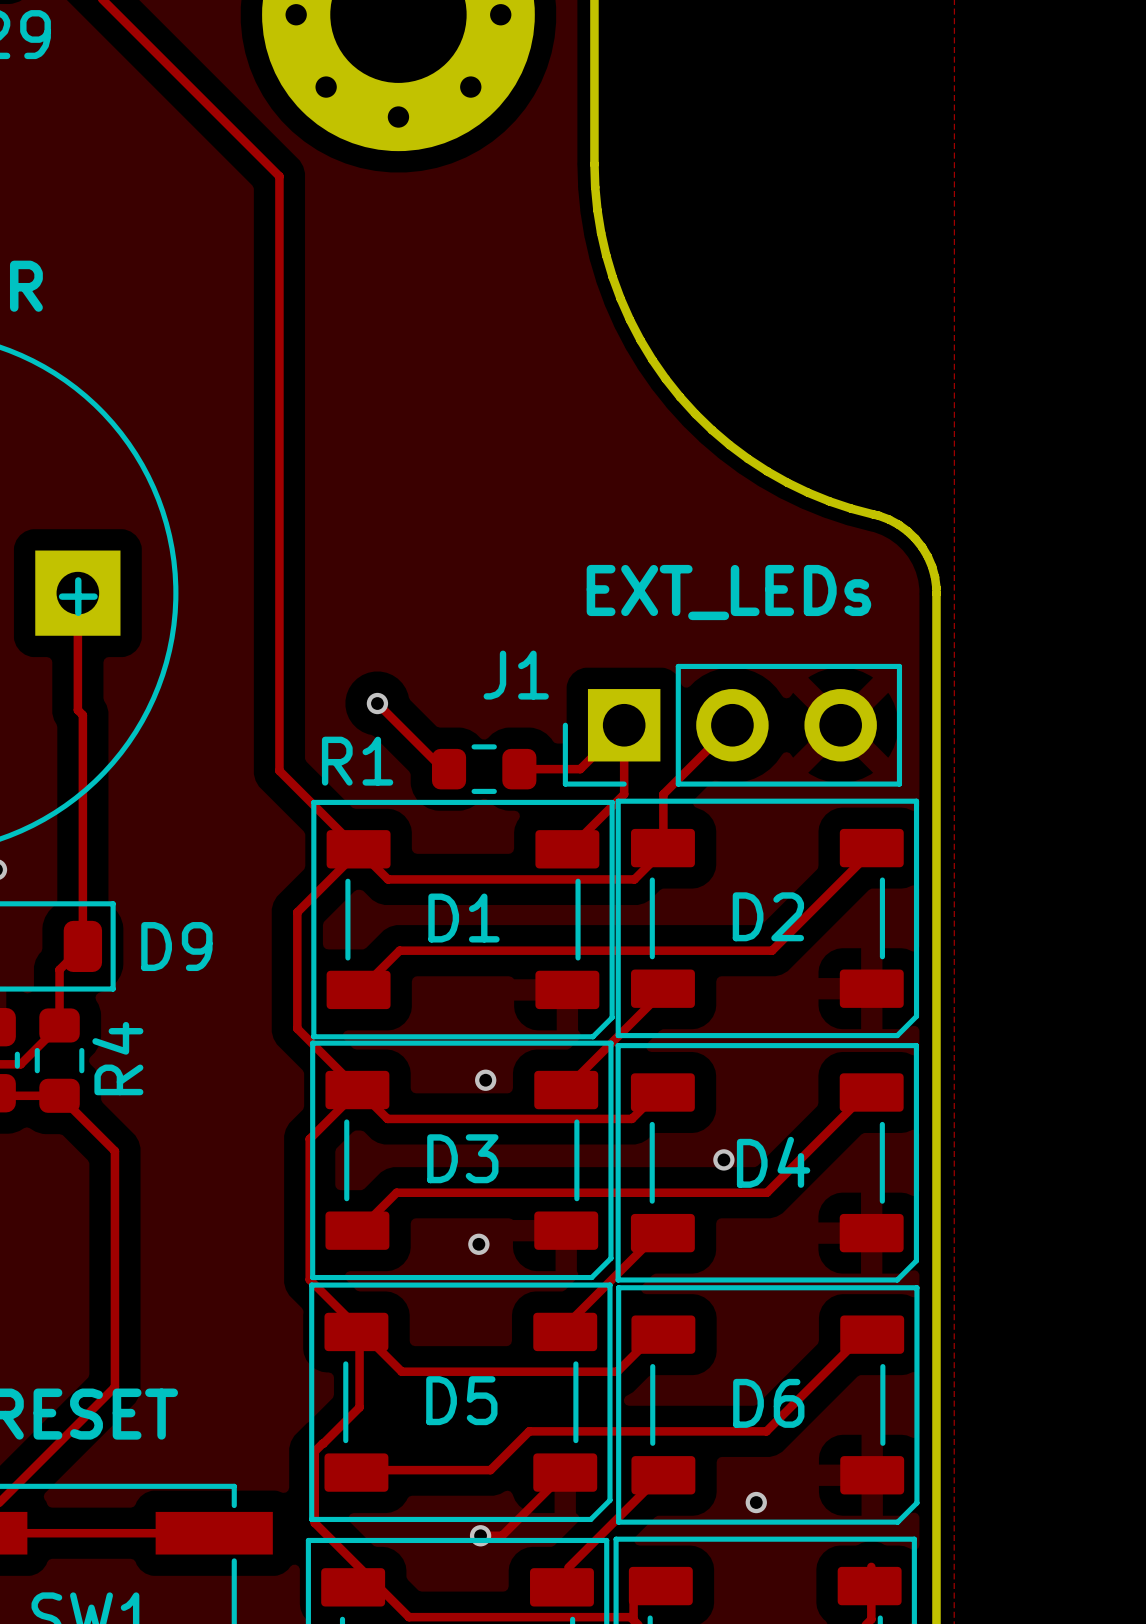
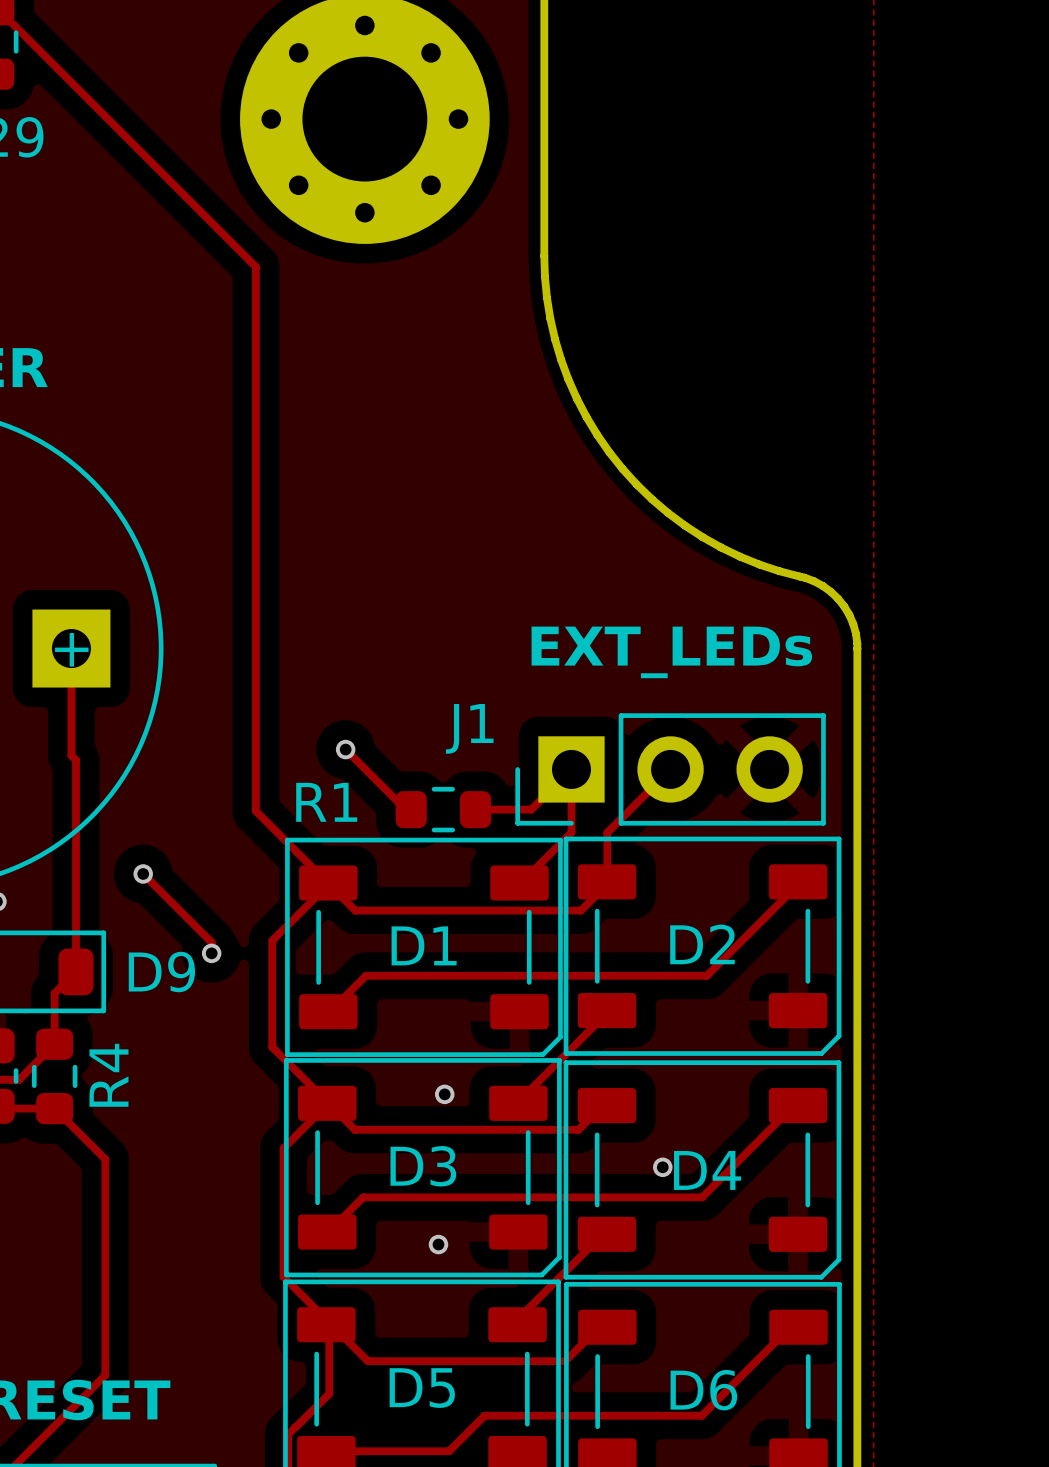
track: none -> (143, 873) (211, 942) (211, 953)
via: none -> (143, 873)
via: none -> (211, 953)

